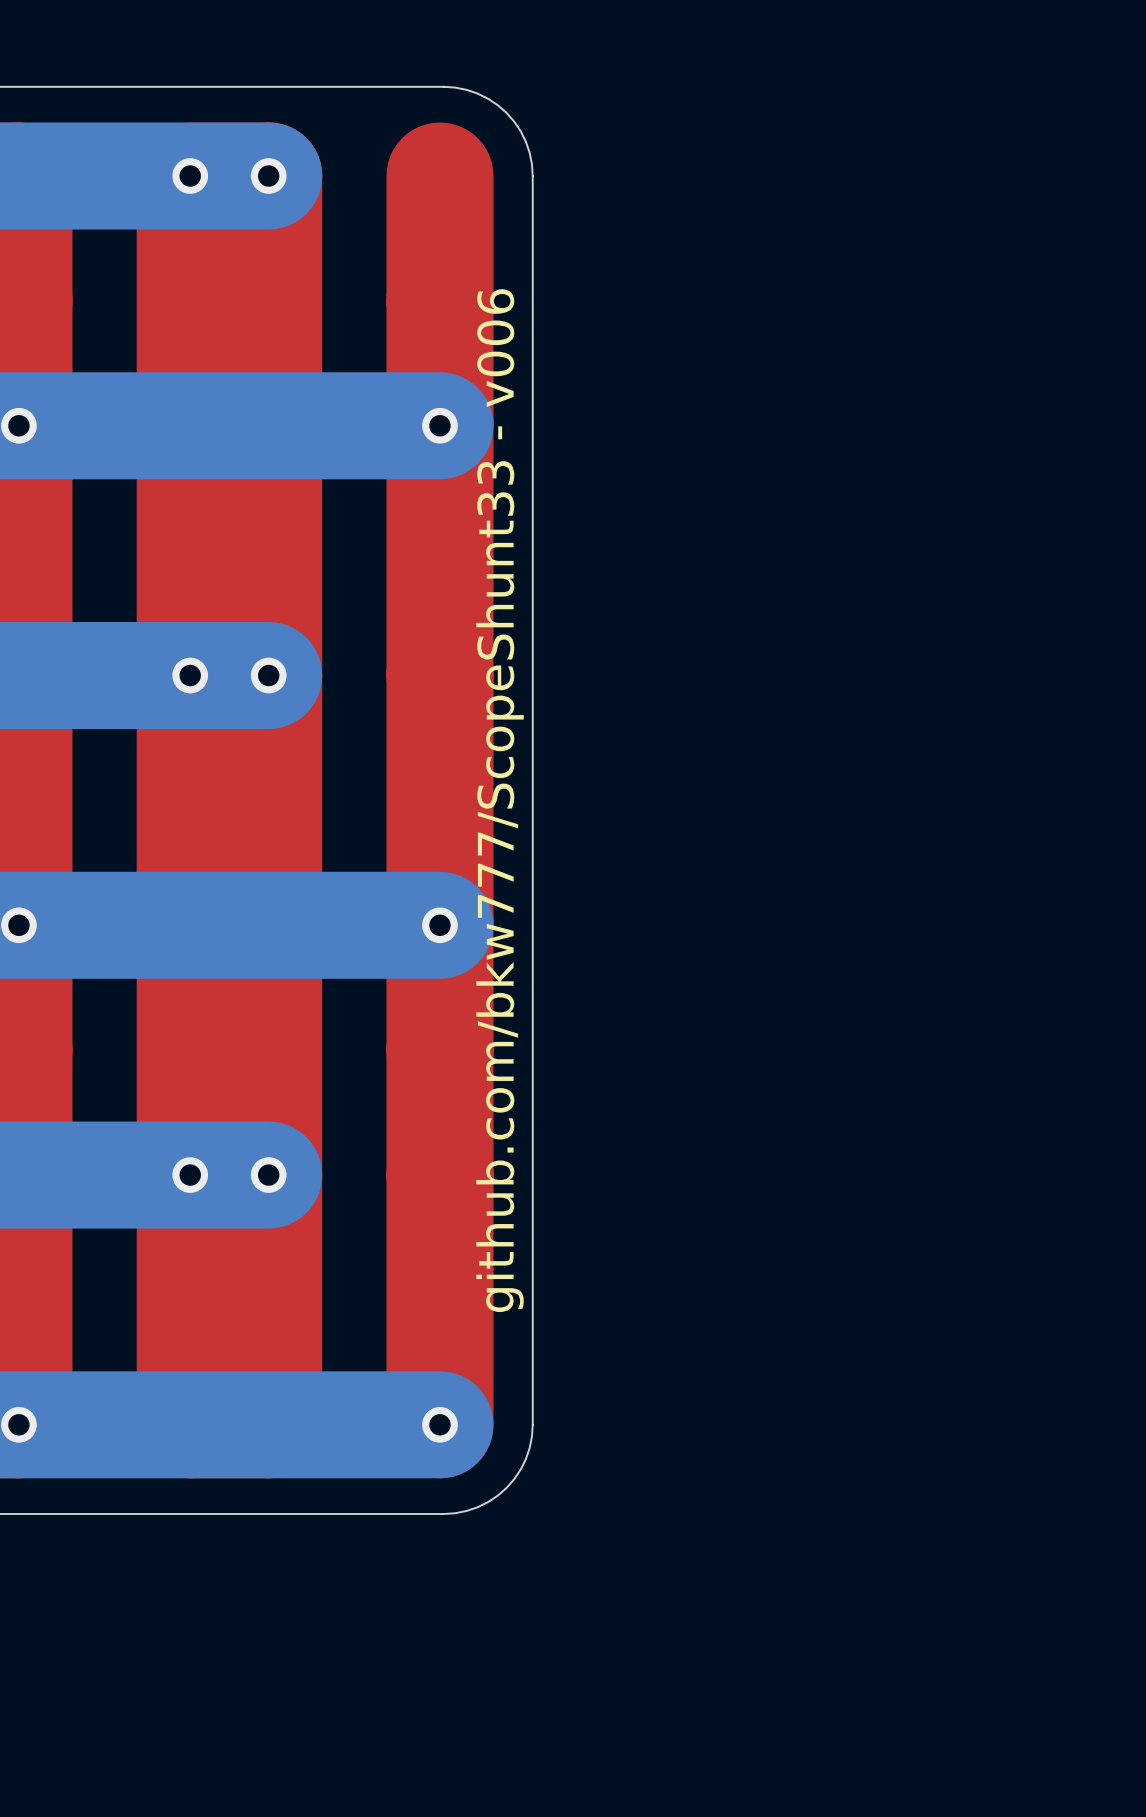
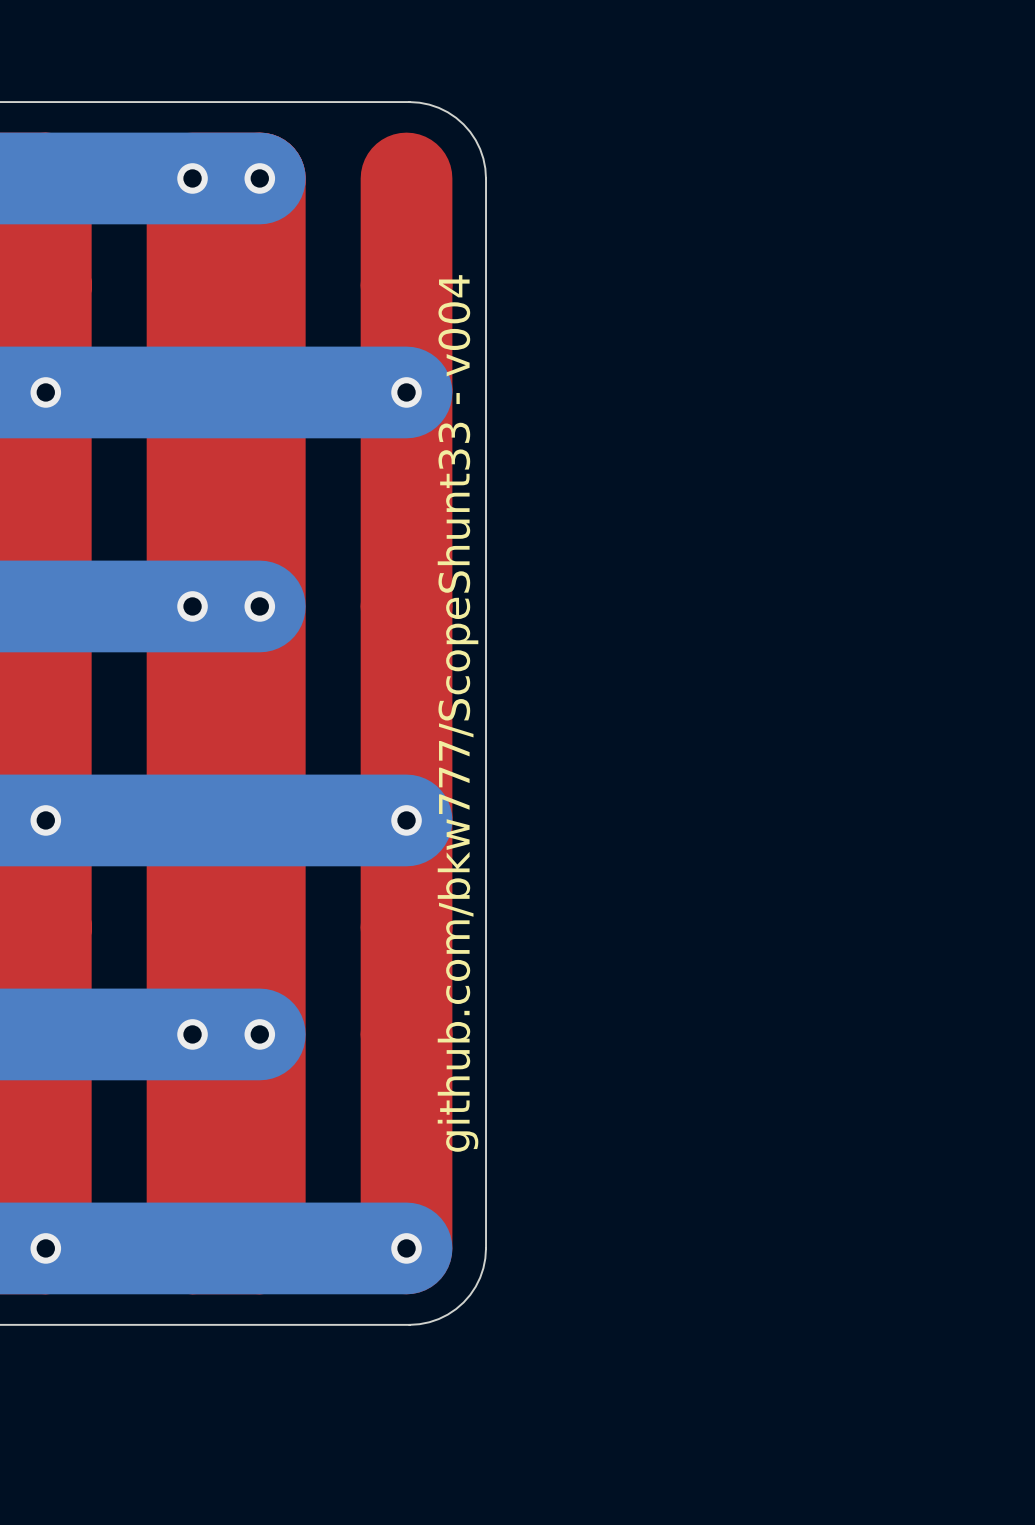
text: github.com/bkw777/ScopeShunt33 - v006 (500, 800) -> github.com/bkw777/ScopeShunt33 - v004 (458, 713)

